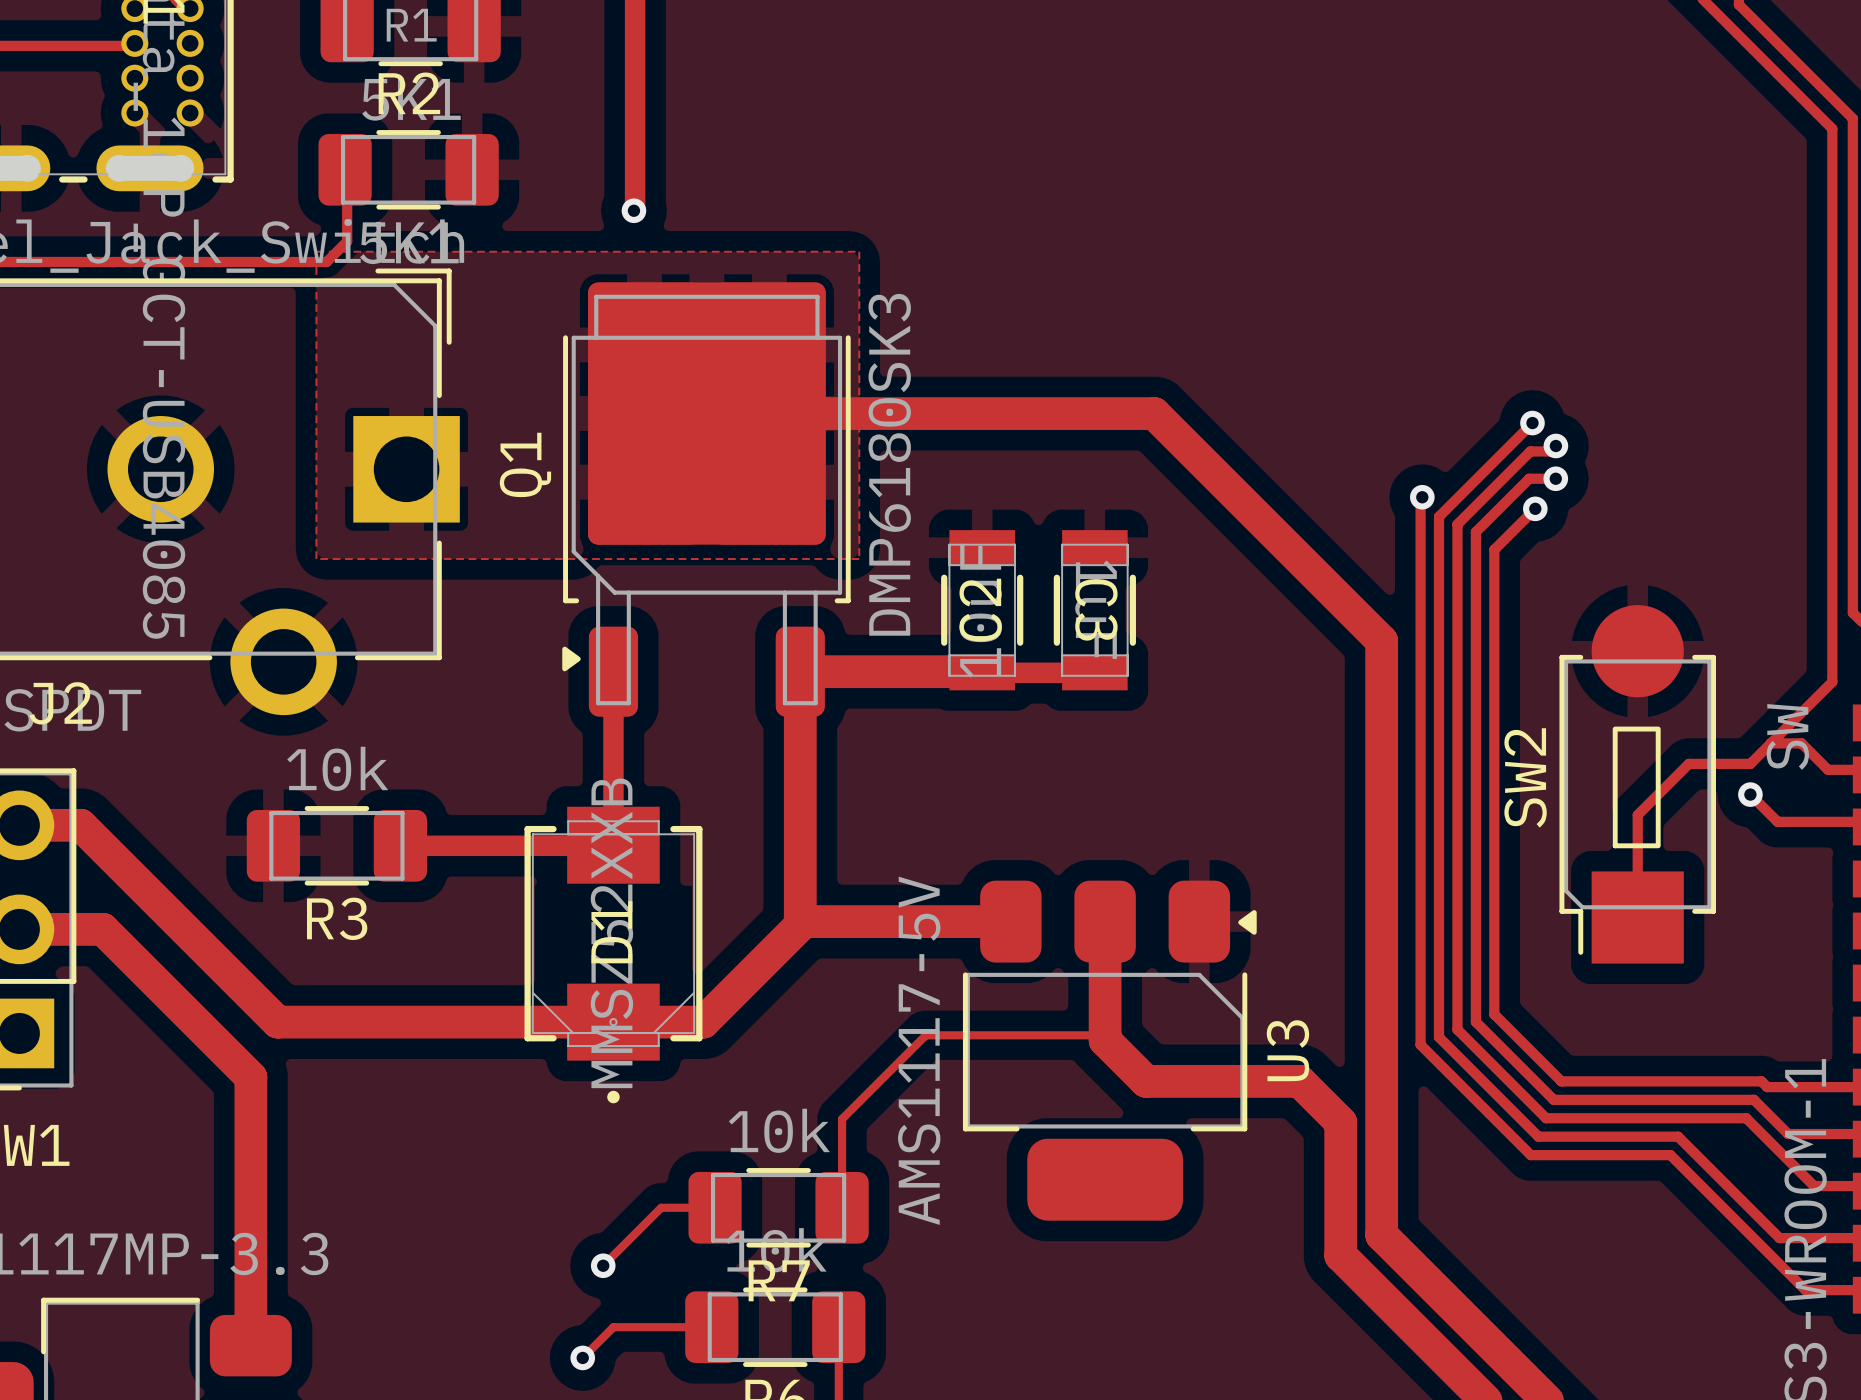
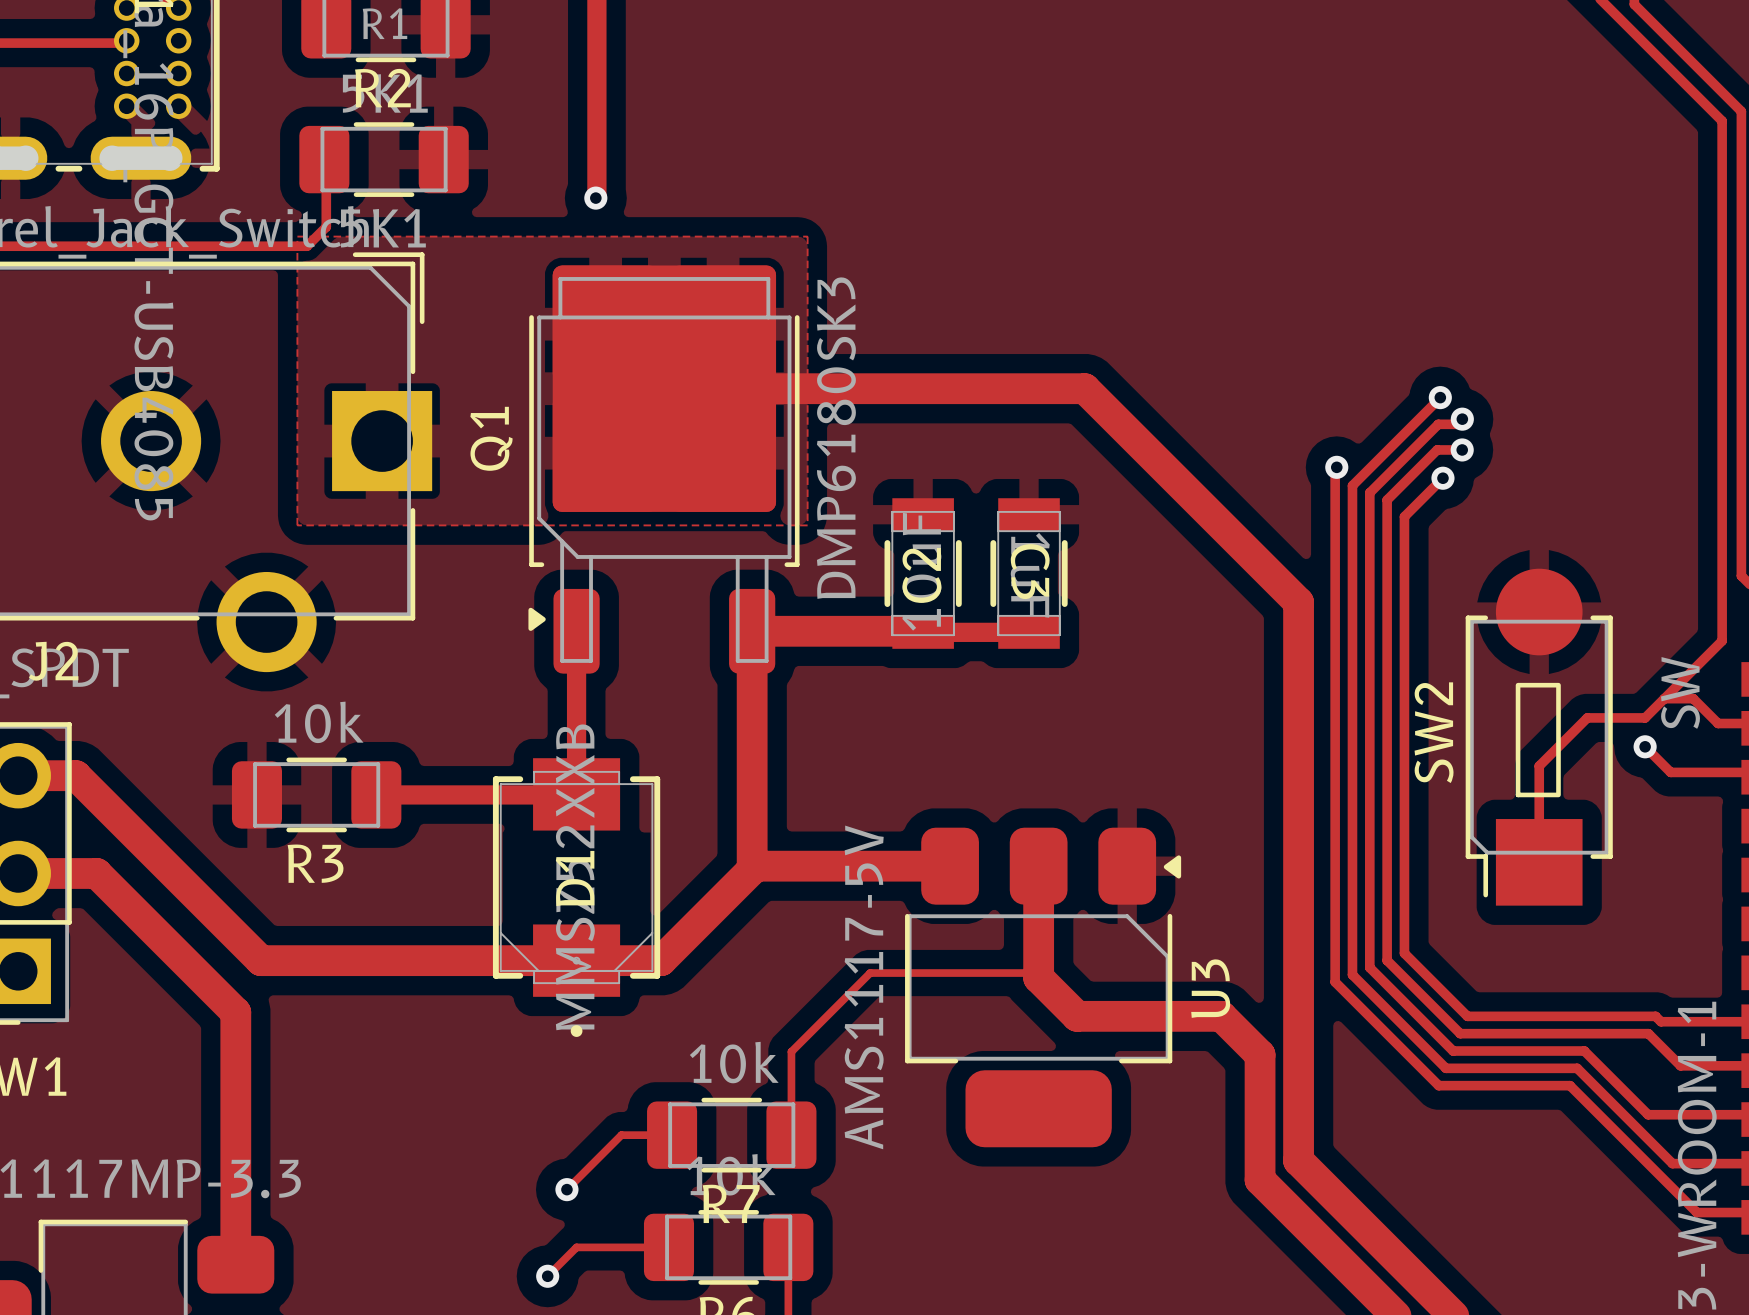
track: (1685, 1118) (1746, 1118) (1814, 1186) -> (1584, 1051) (1648, 1114) (1705, 1114)

